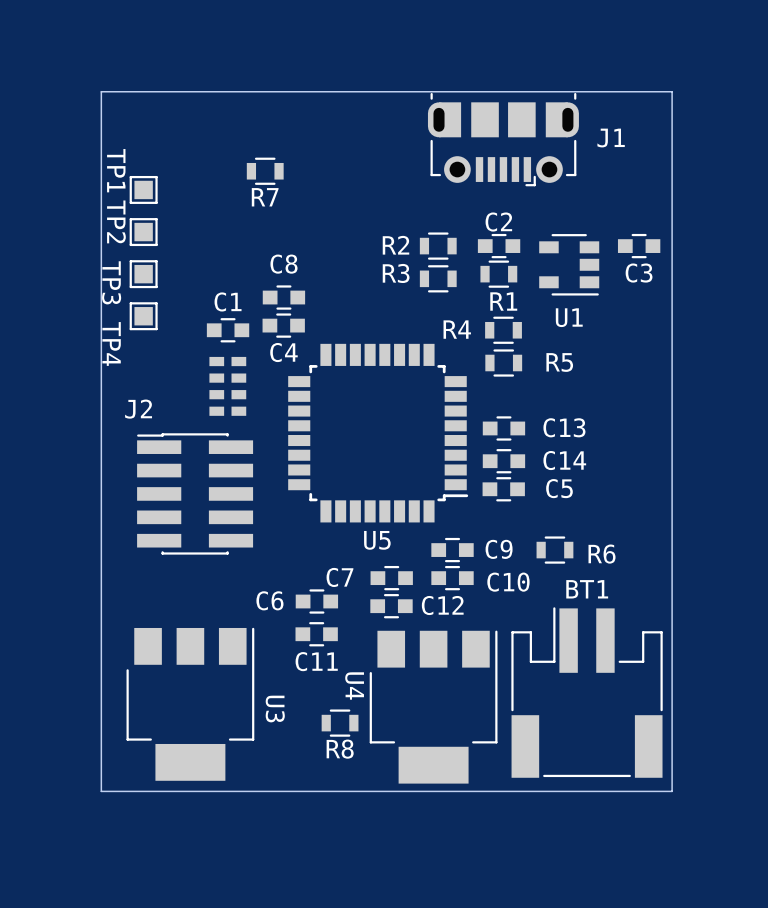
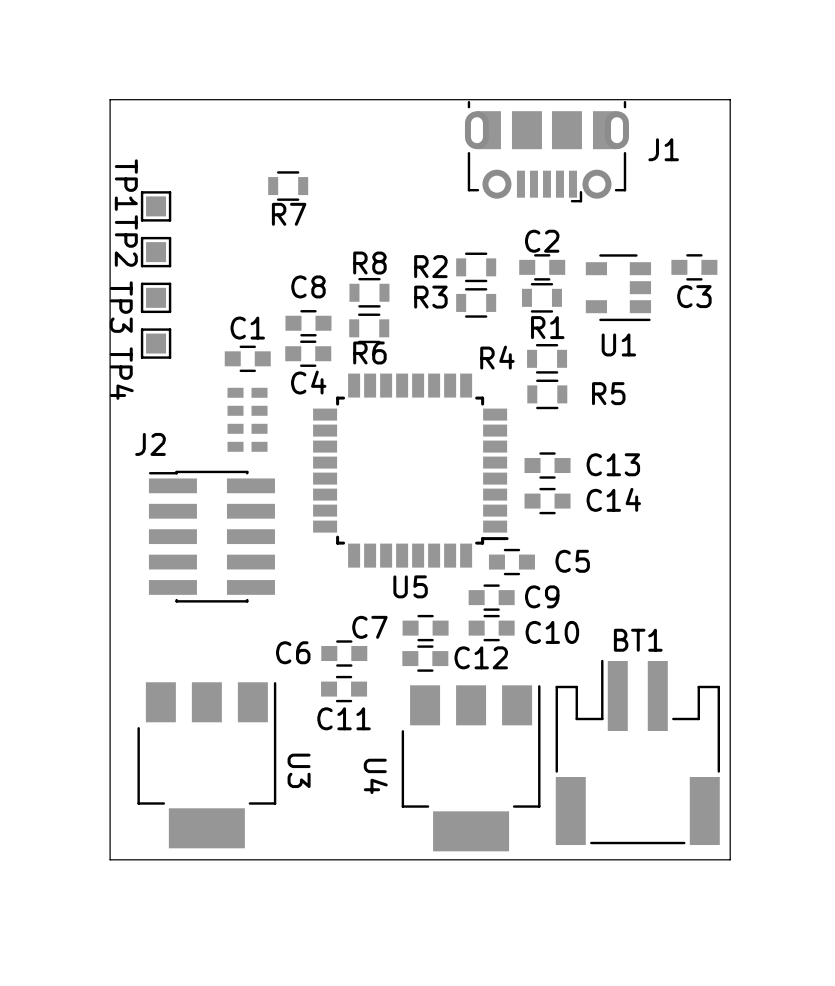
C5 position: (503, 489) -> (511, 562)
R6 position: (554, 550) -> (369, 328)
R6 name position: R6 (602, 554) -> R6 (369, 352)
U4 name position: U4 (354, 685) -> U4 (375, 776)
R8 position: (340, 723) -> (369, 292)
R8 name position: R8 (340, 749) -> R8 (369, 263)

